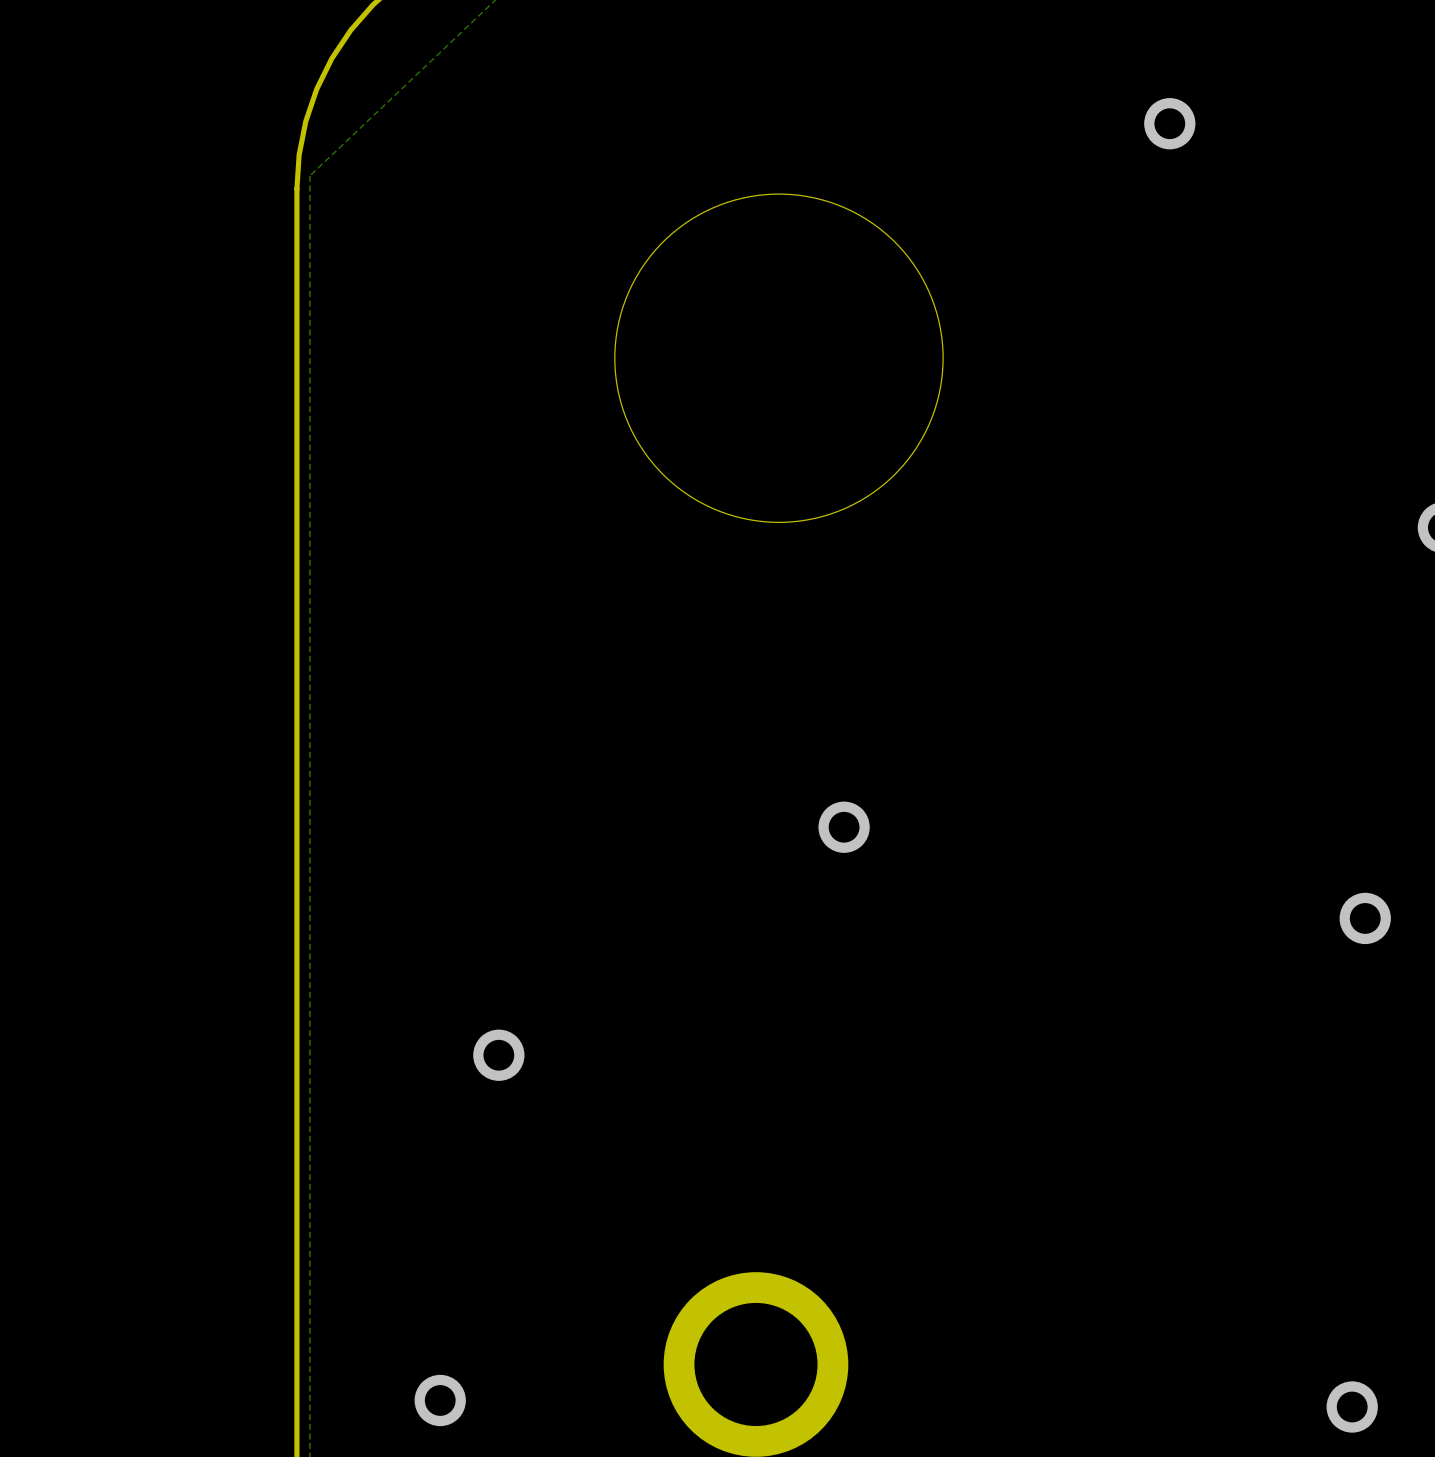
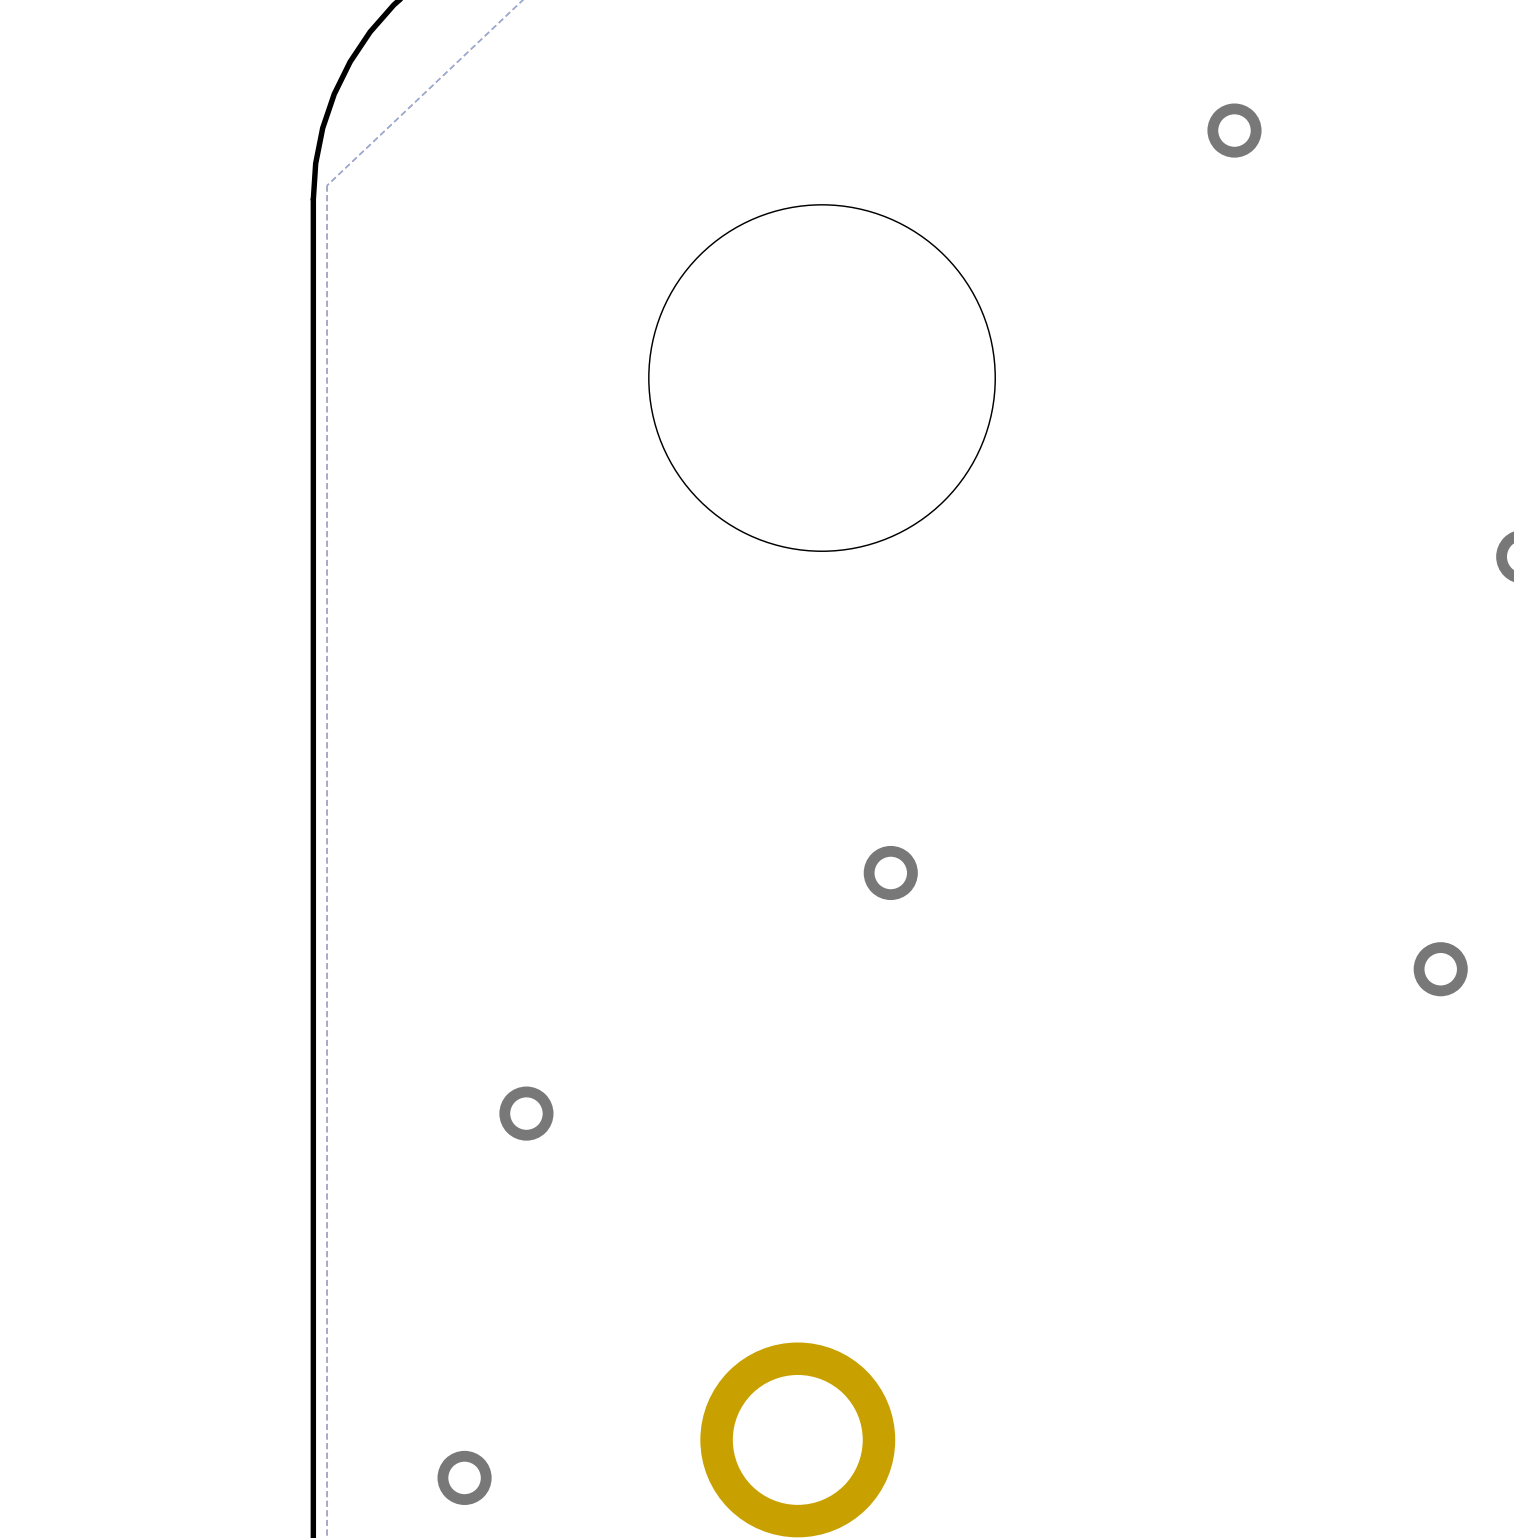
via: (1352, 1407) -> none

